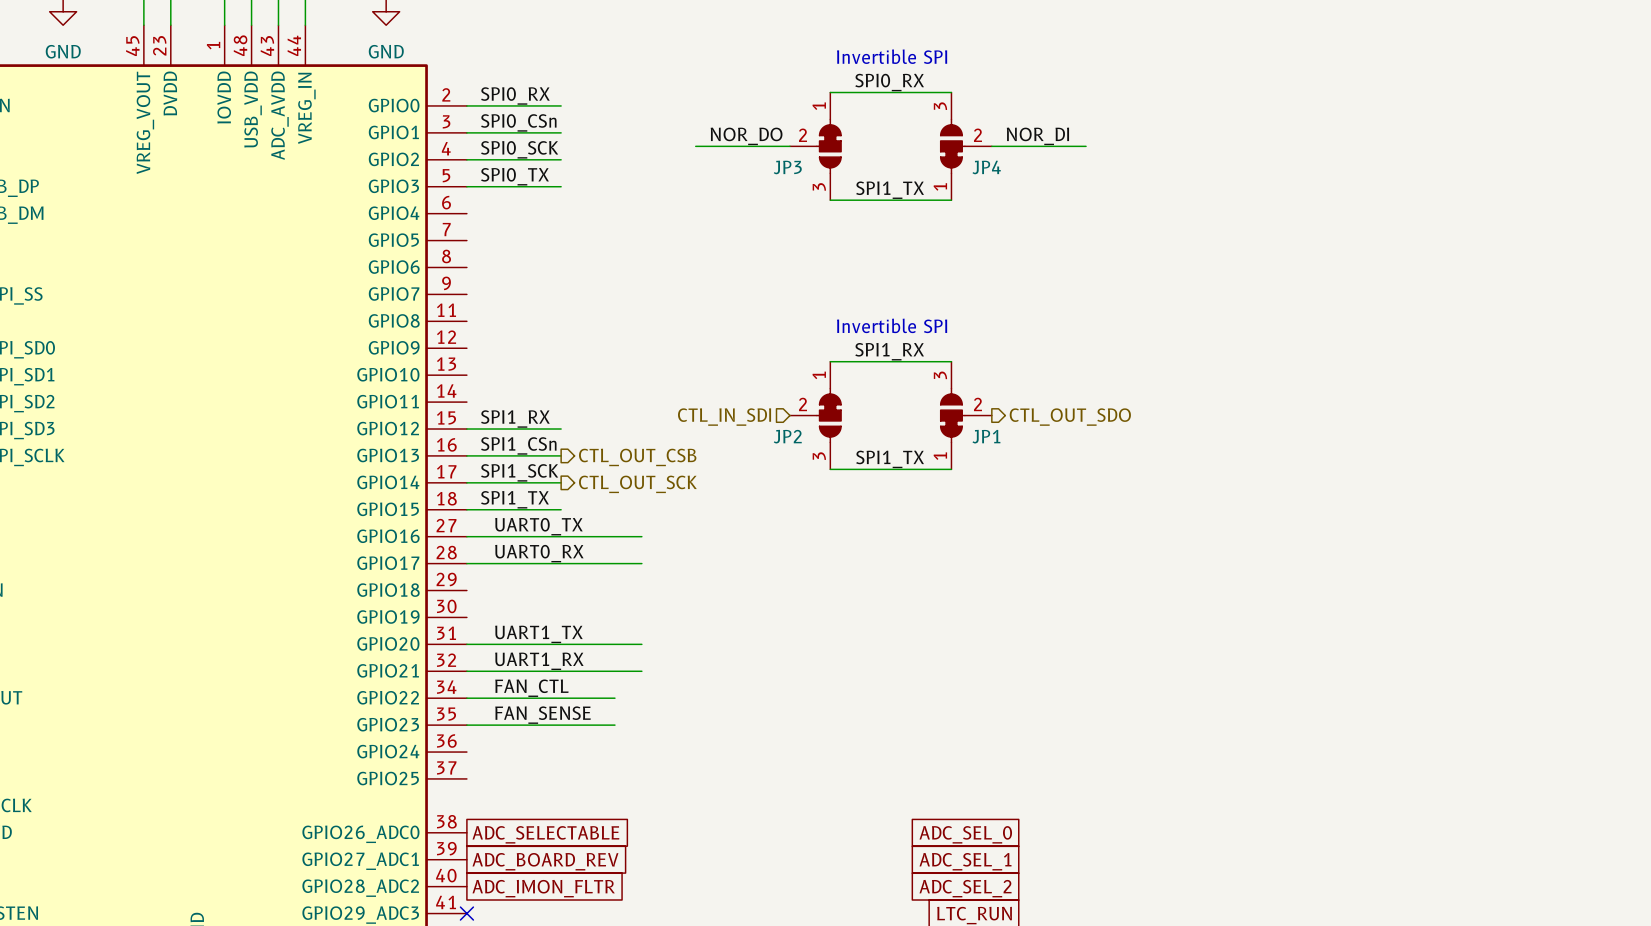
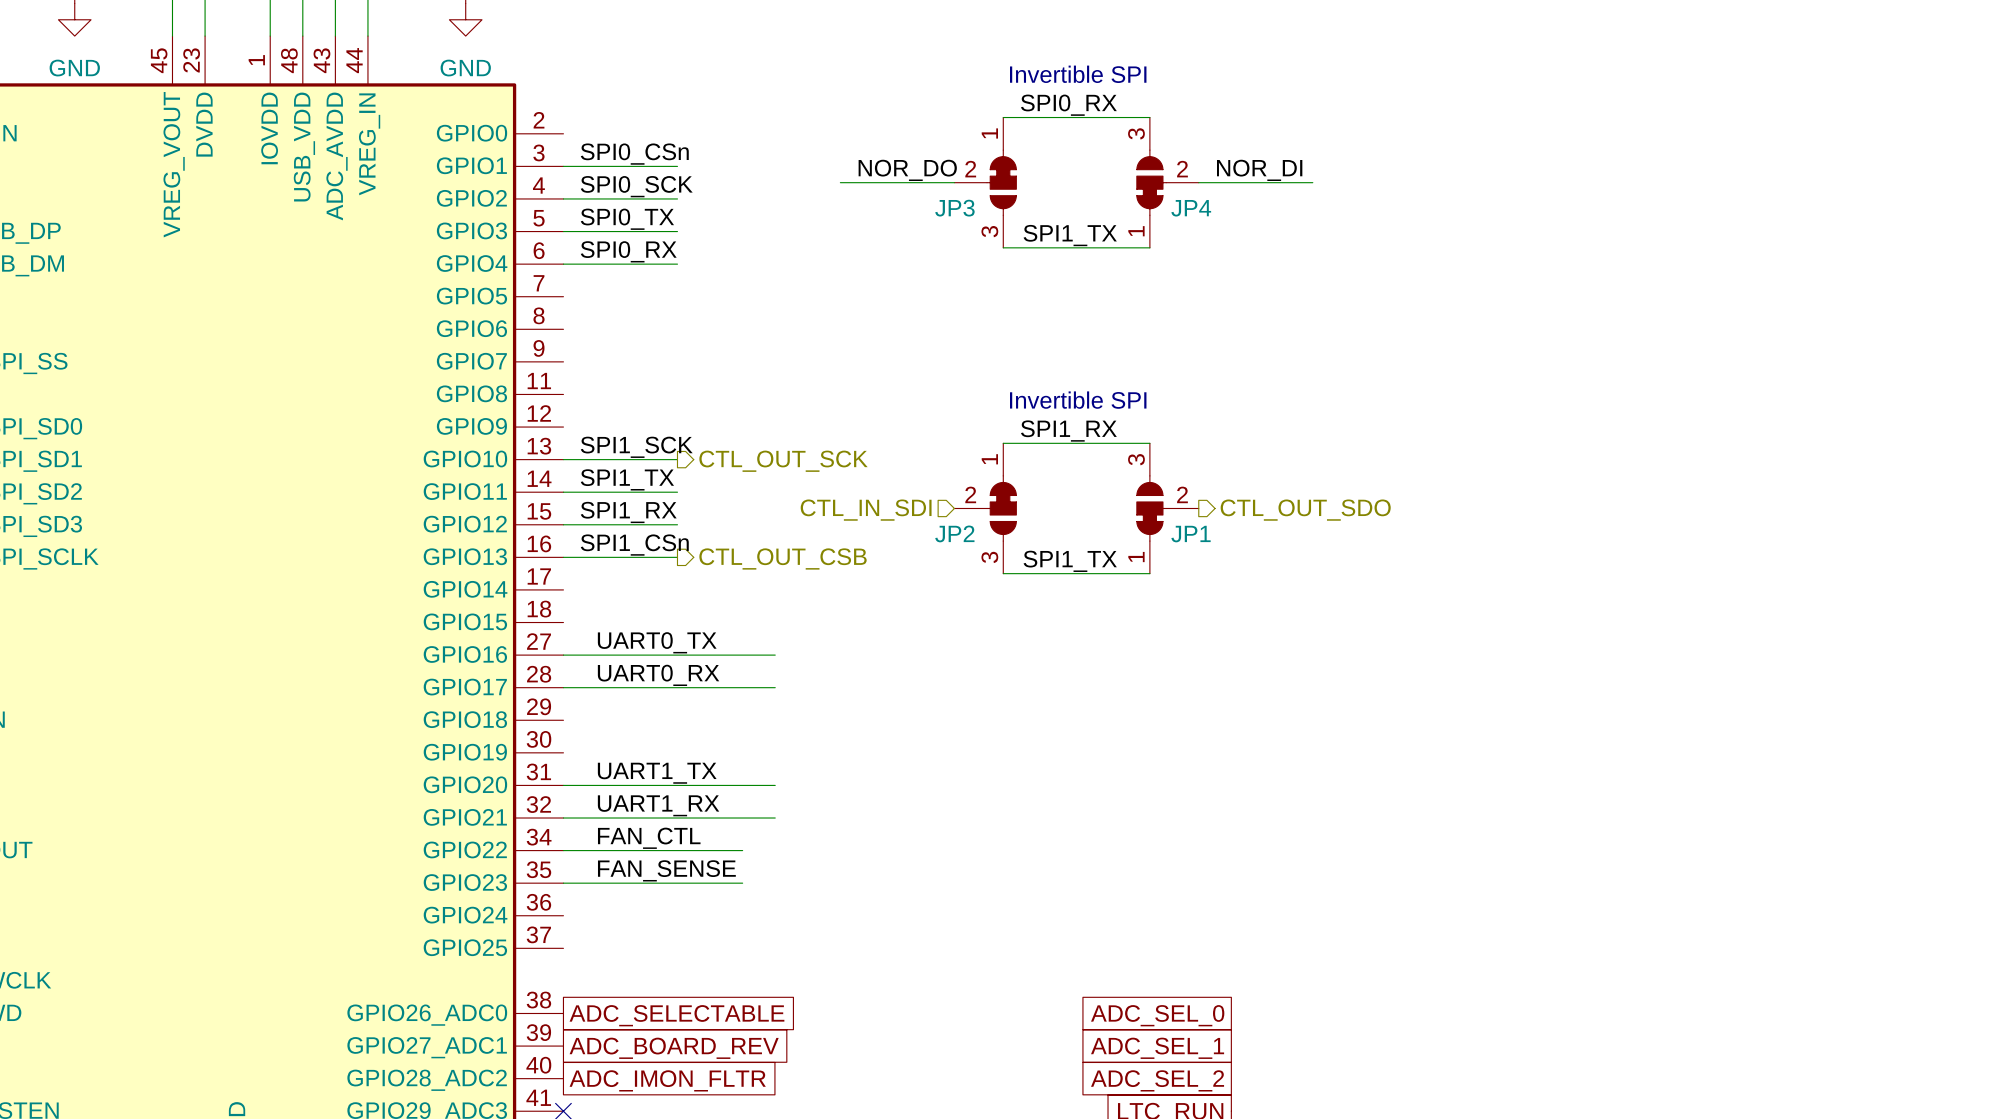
label position: SPI0_RX (515, 95) -> SPI0_RX (628, 251)
wire: (466, 105) (561, 105) -> (563, 264) (677, 264)
label position: SPI1_SCK (519, 472) -> SPI1_SCK (636, 447)
wire: (466, 482) (561, 482) -> (563, 492) (677, 492)
hierarchical label position: CTL_OUT_SCK (637, 484) -> CTL_OUT_SCK (783, 461)
label position: SPI1_TX (514, 499) -> SPI1_TX (627, 479)
wire: (466, 509) (561, 509) -> (563, 459) (677, 459)

